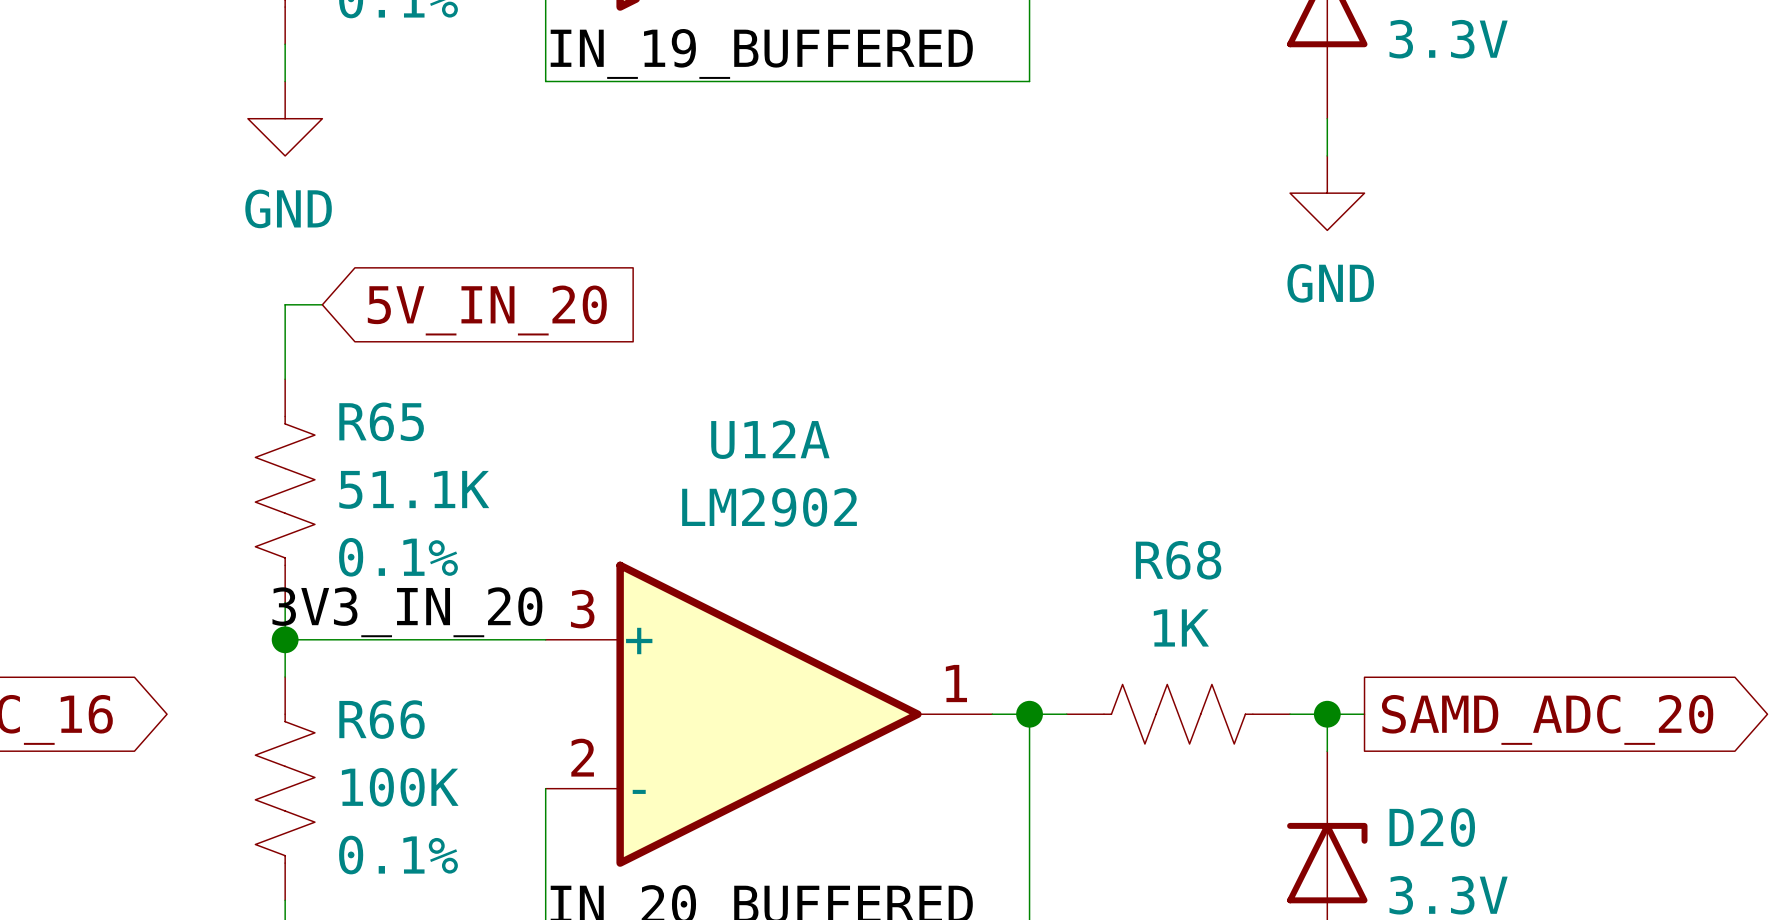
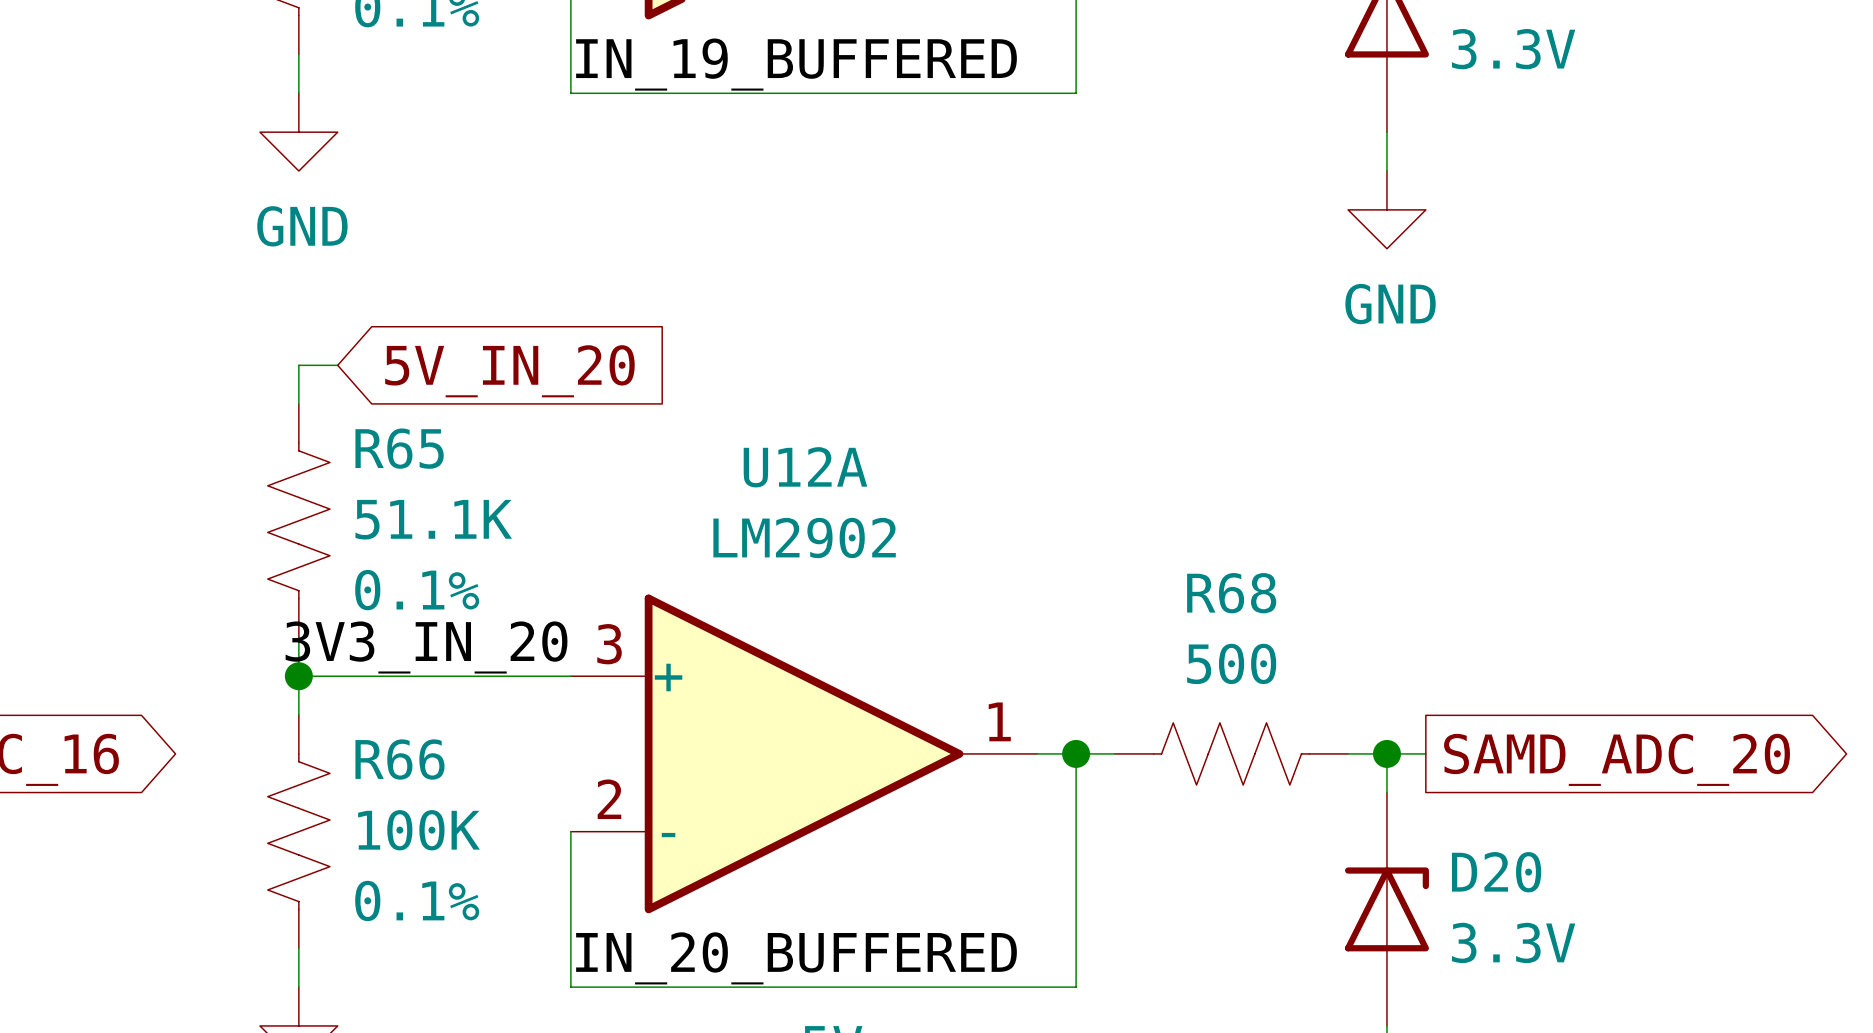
wire: (322, 304) (285, 304) (285, 342) -> (337, 365) (298, 365)
global label position: 5V_IN_20 (487, 310) -> 5V_IN_20 (509, 371)
R68 value: 1K (1181, 627) -> 500 (1231, 663)

